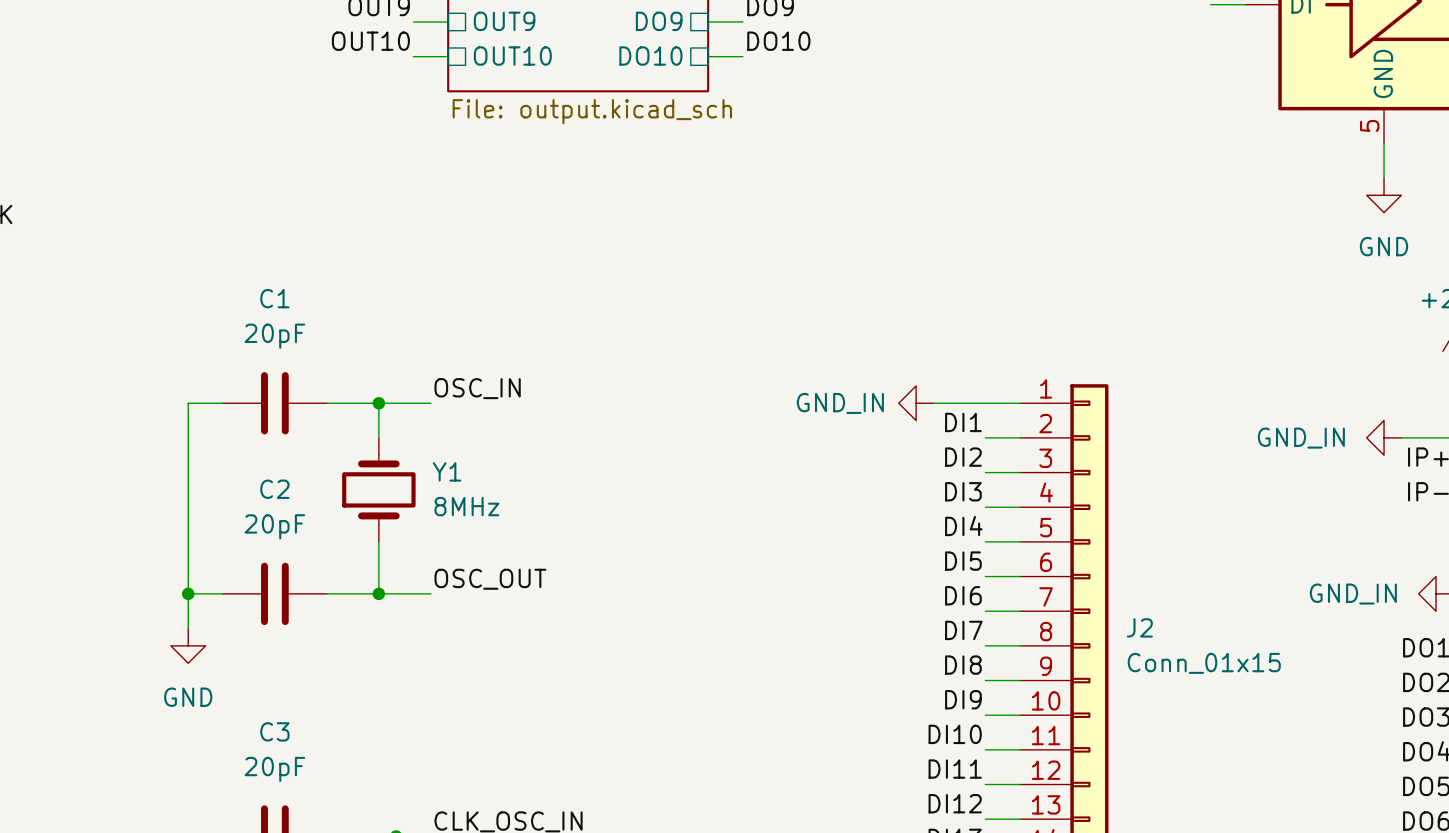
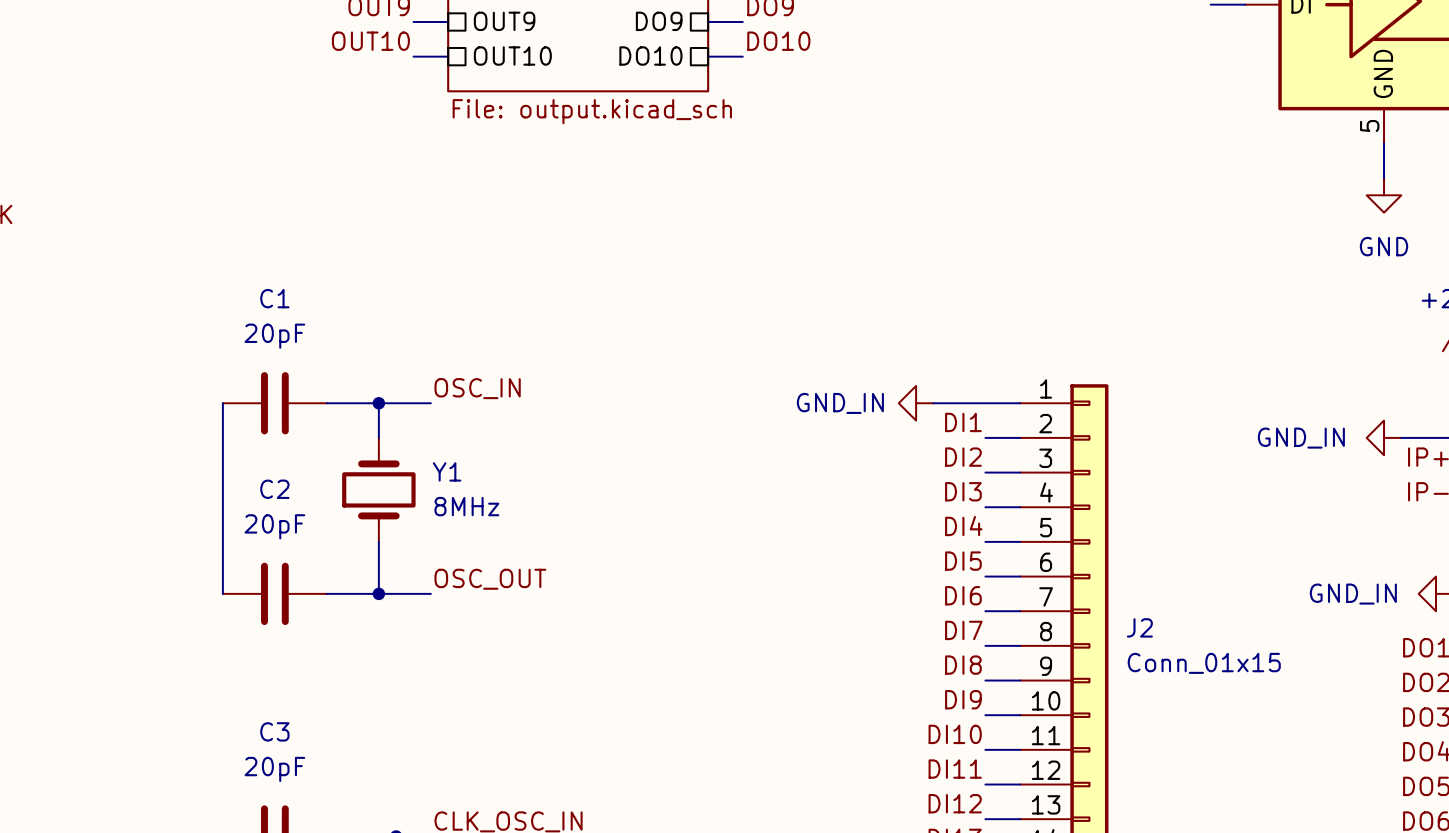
wire: (222, 403) (188, 403) (188, 628) -> (222, 403) (222, 593)
wire: (188, 593) (222, 593) -> none
junction: (188, 593) -> none
power symbol: GND (188, 645) -> none

